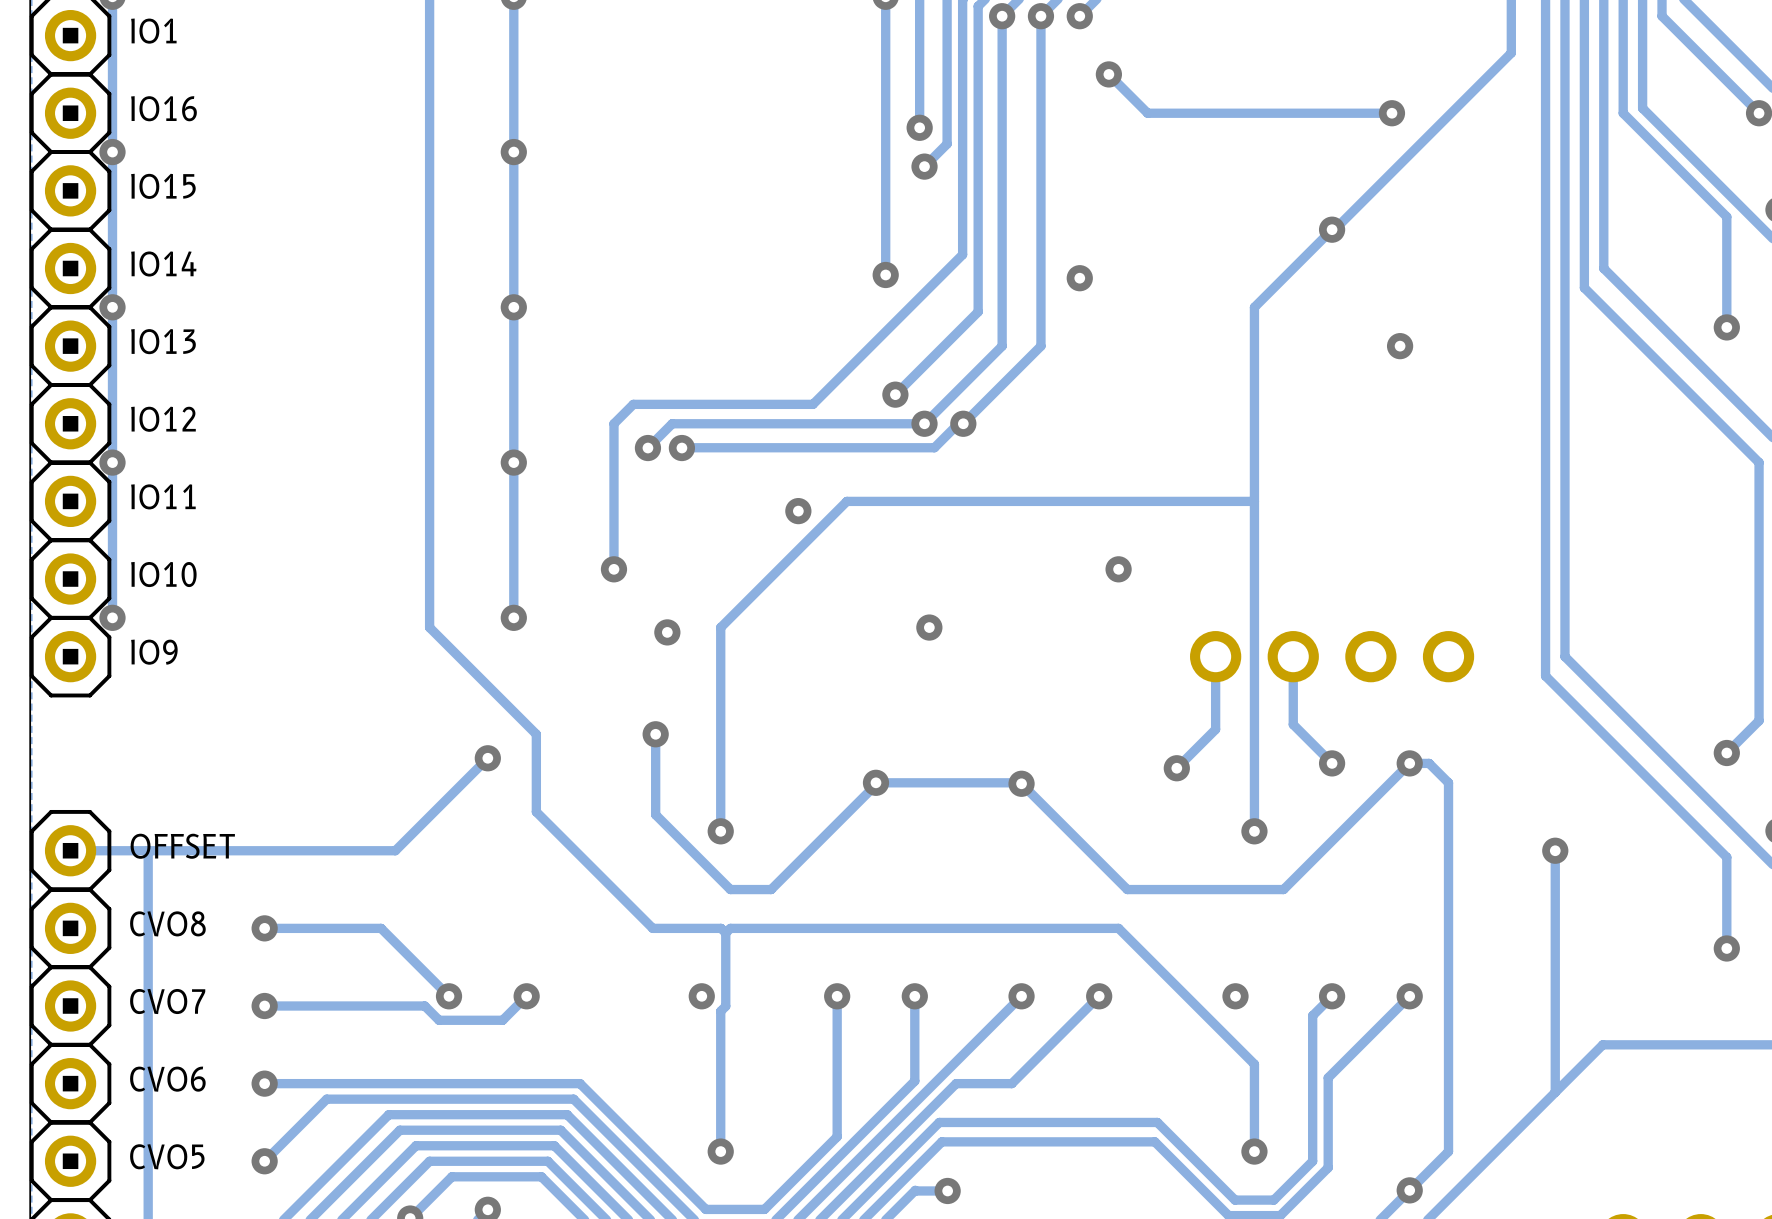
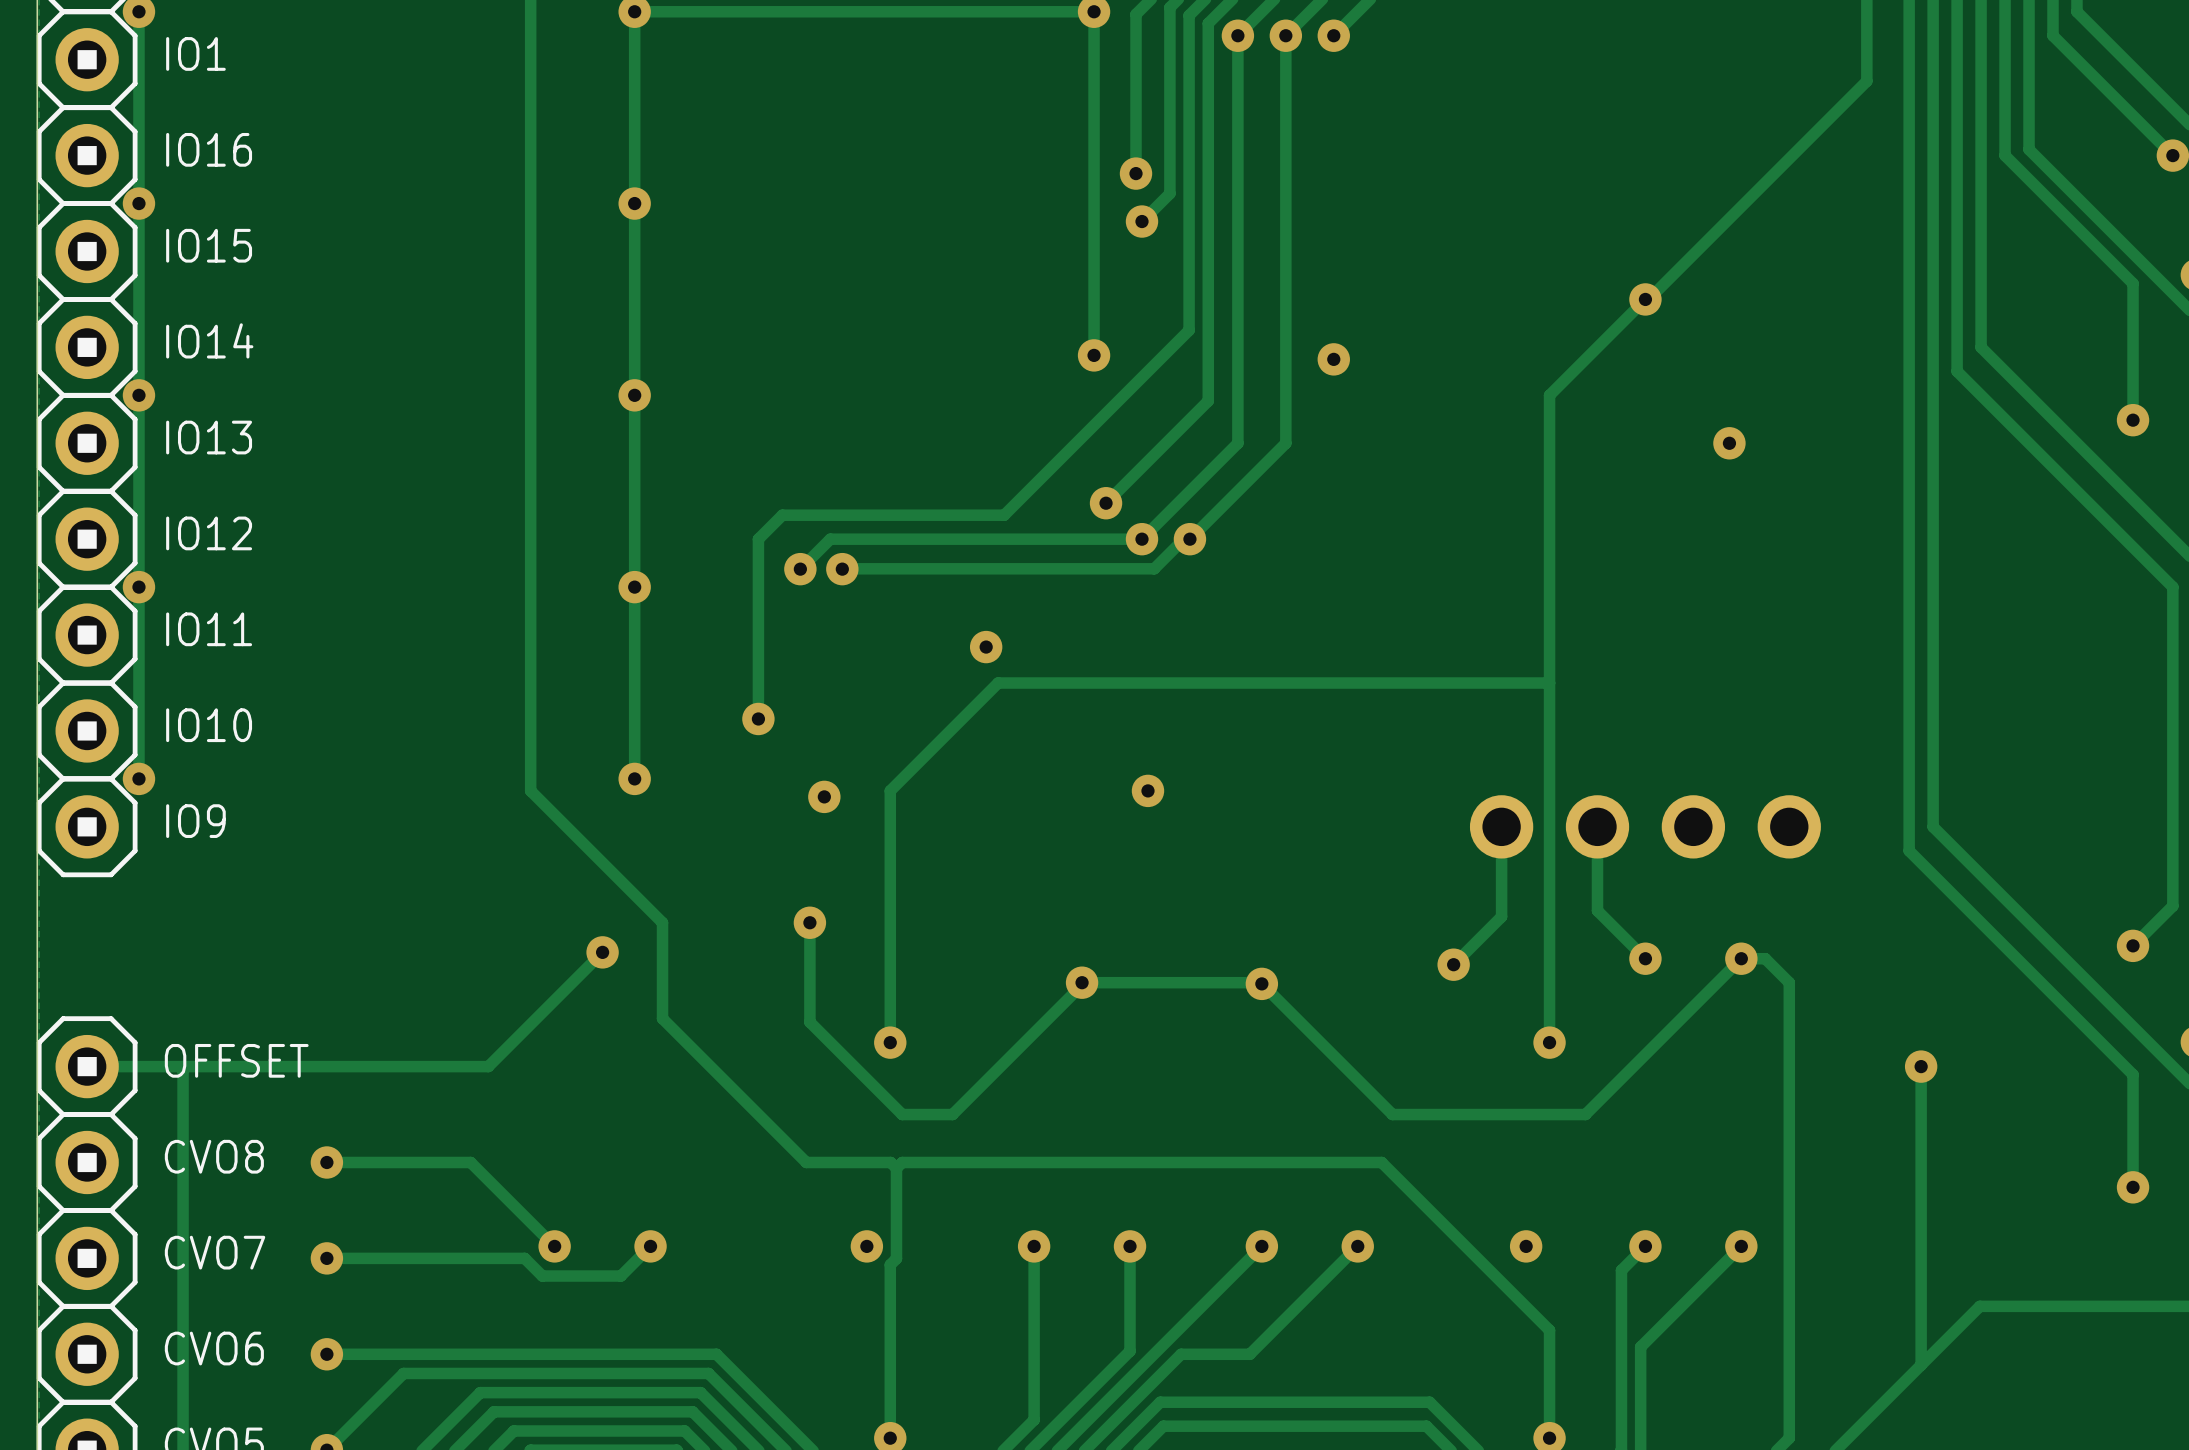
track: (1108, 74) (1147, 113) (1391, 113) -> none
via: (1108, 74) -> none
via: (1391, 113) -> none
track: (1254, 501) (846, 501) (808, 540) -> (1549, 683) (998, 683)
via: (1118, 569) -> none

